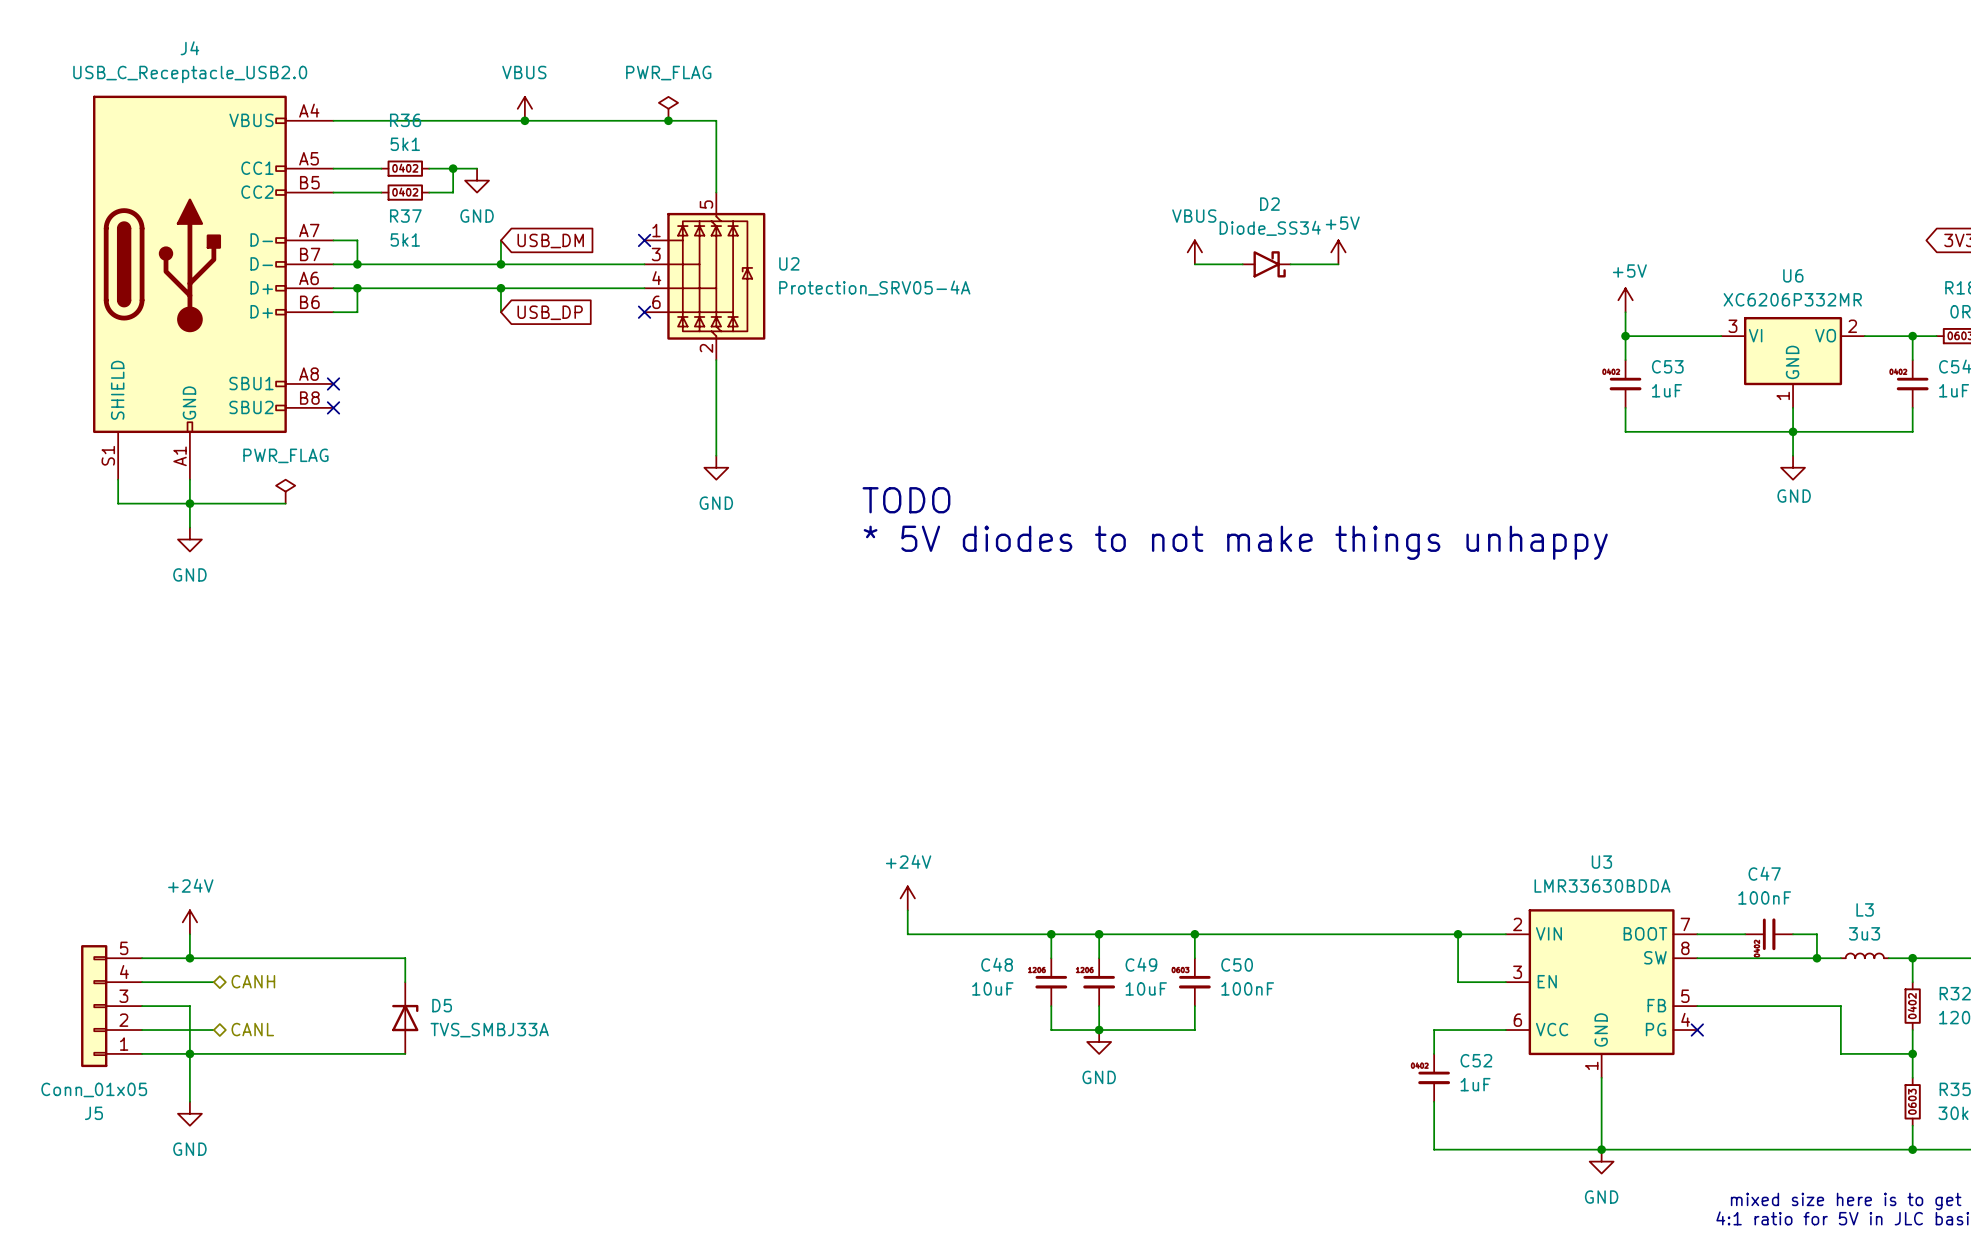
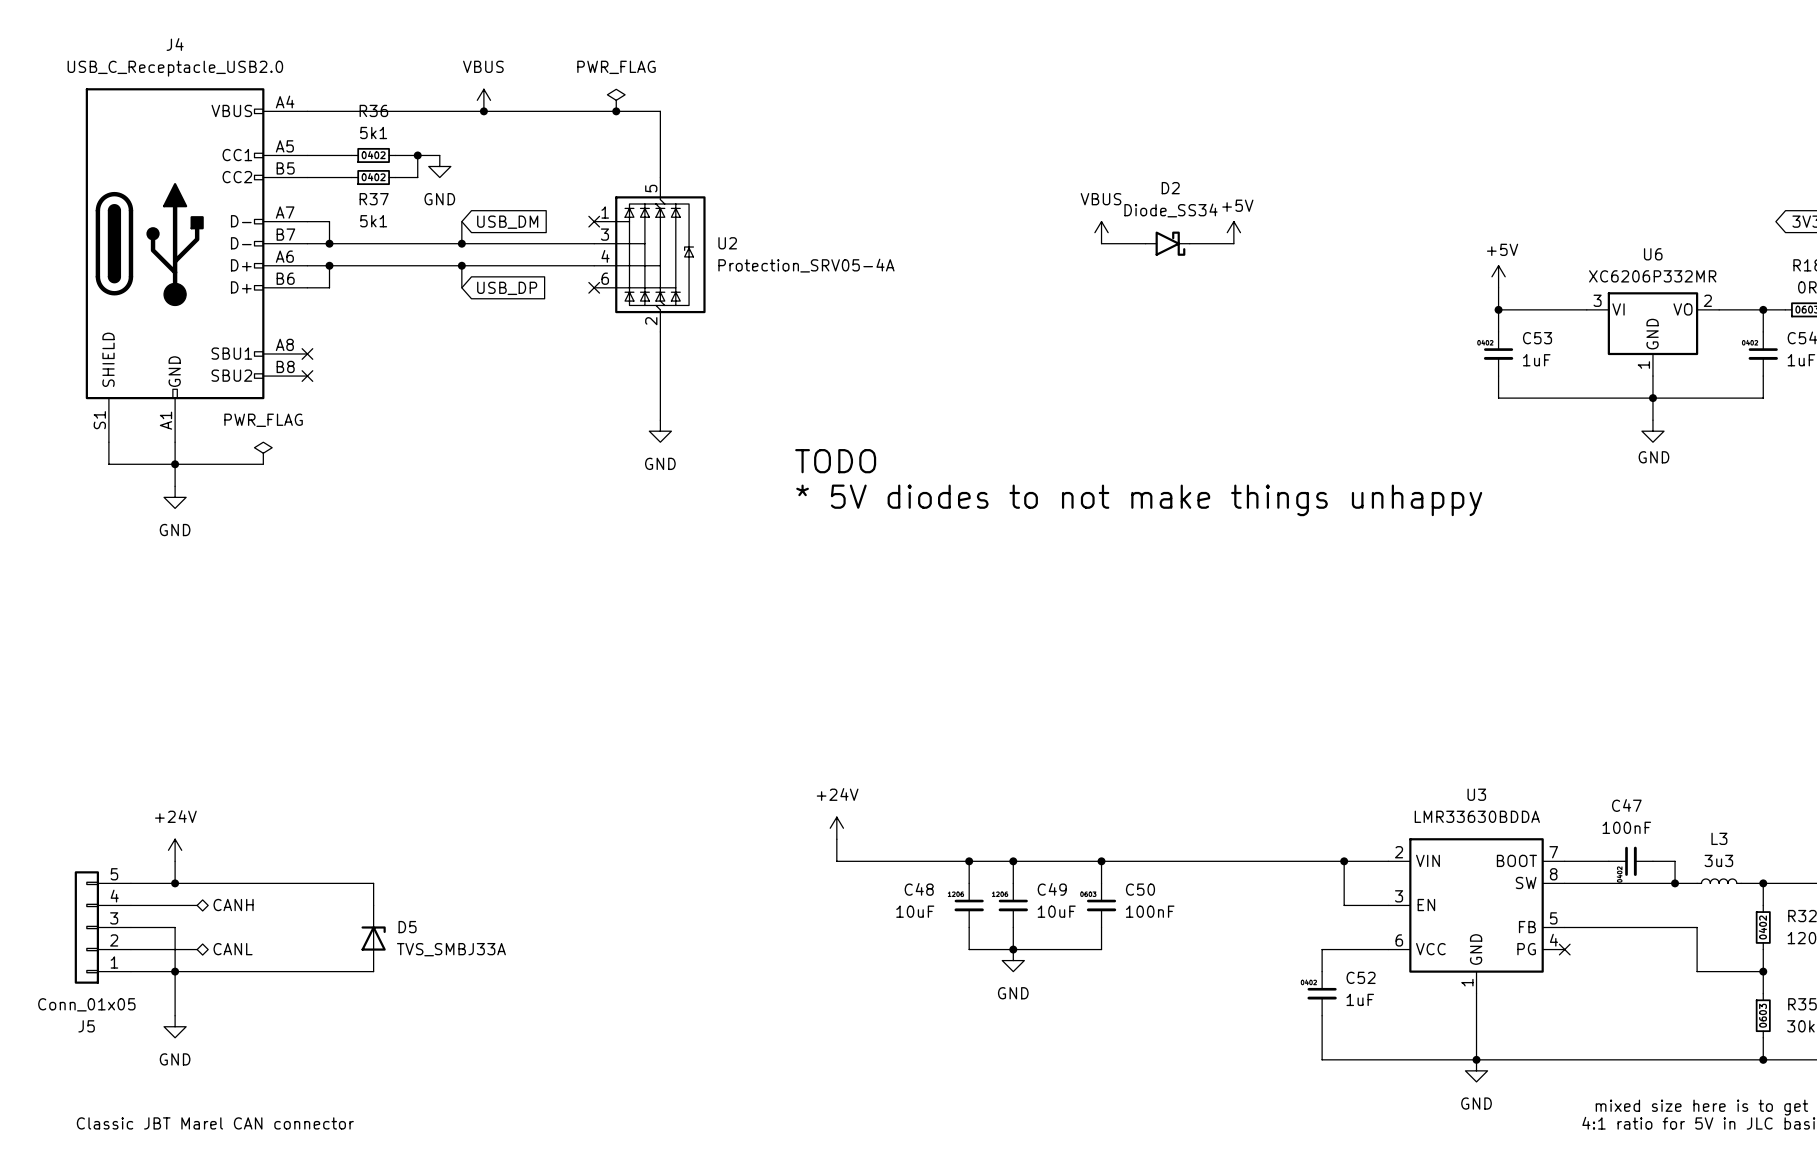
text: none -> Classic JBT Marel CAN connector (215, 1123)

